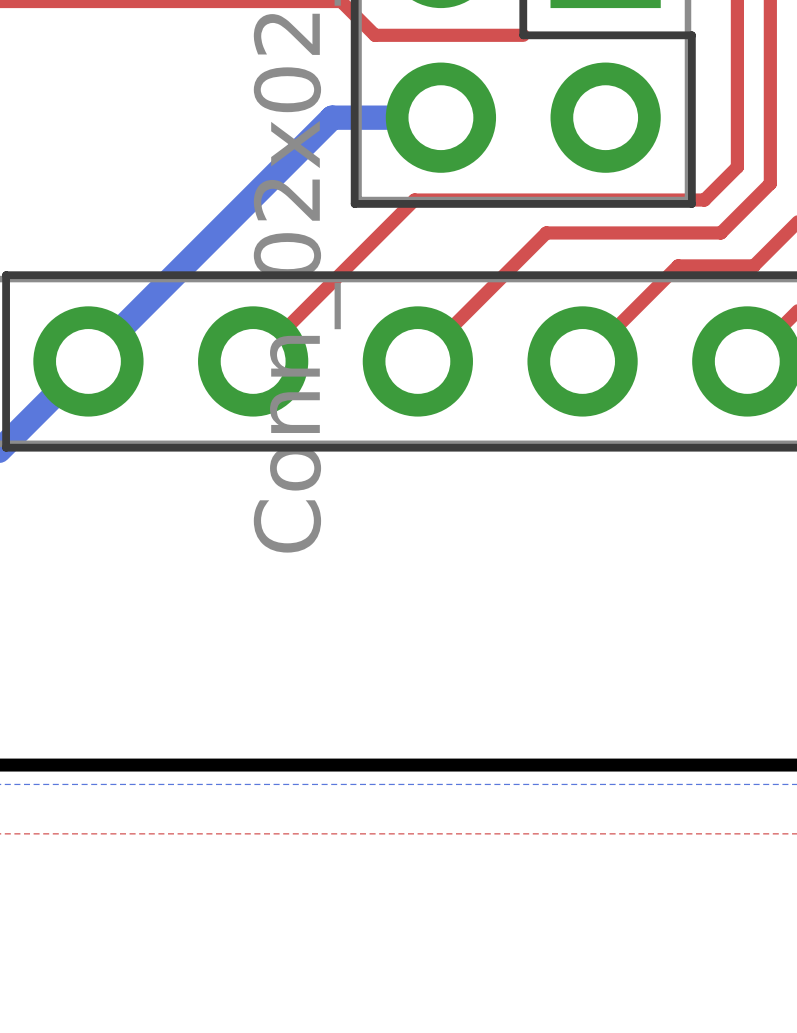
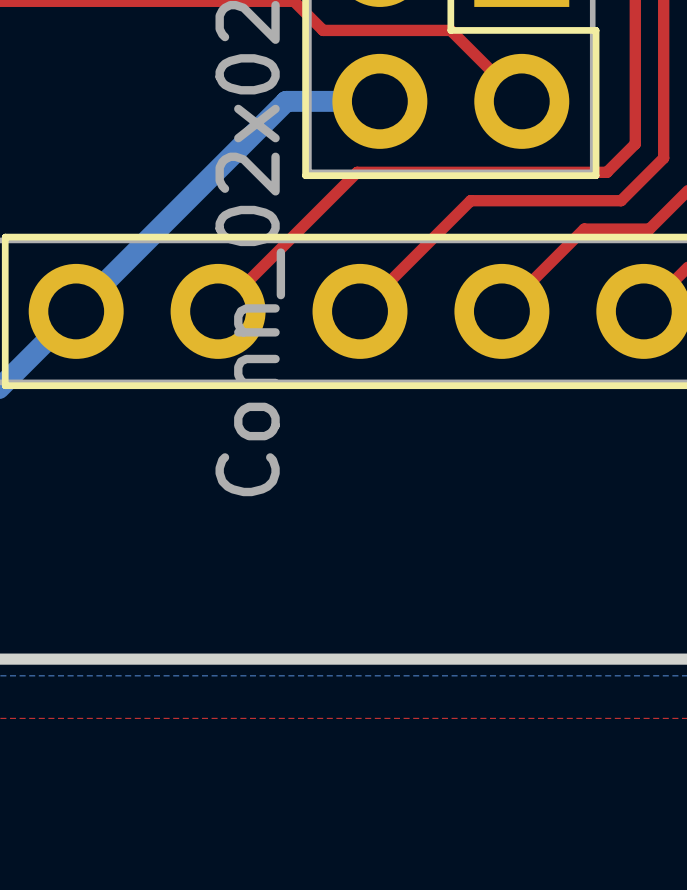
top track: none -> (450, 30) (521, 101)

